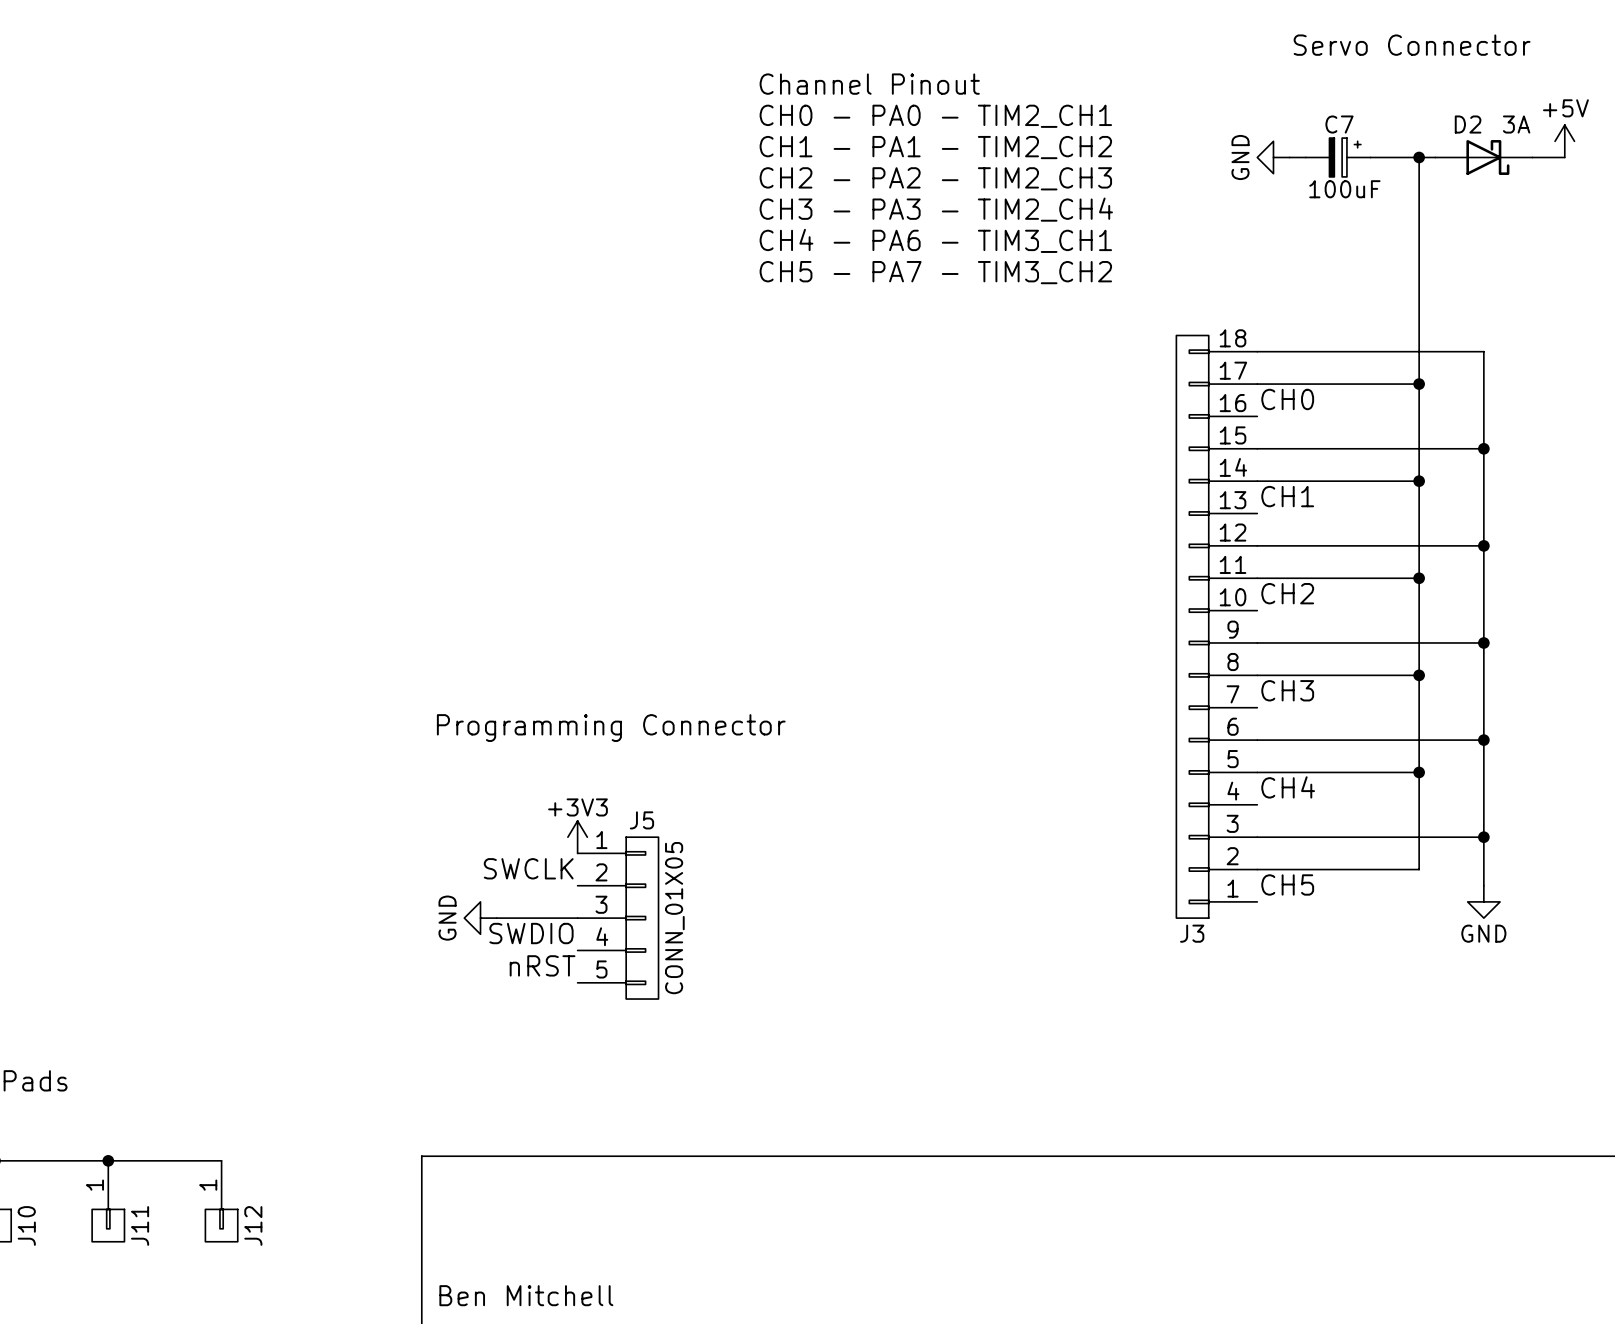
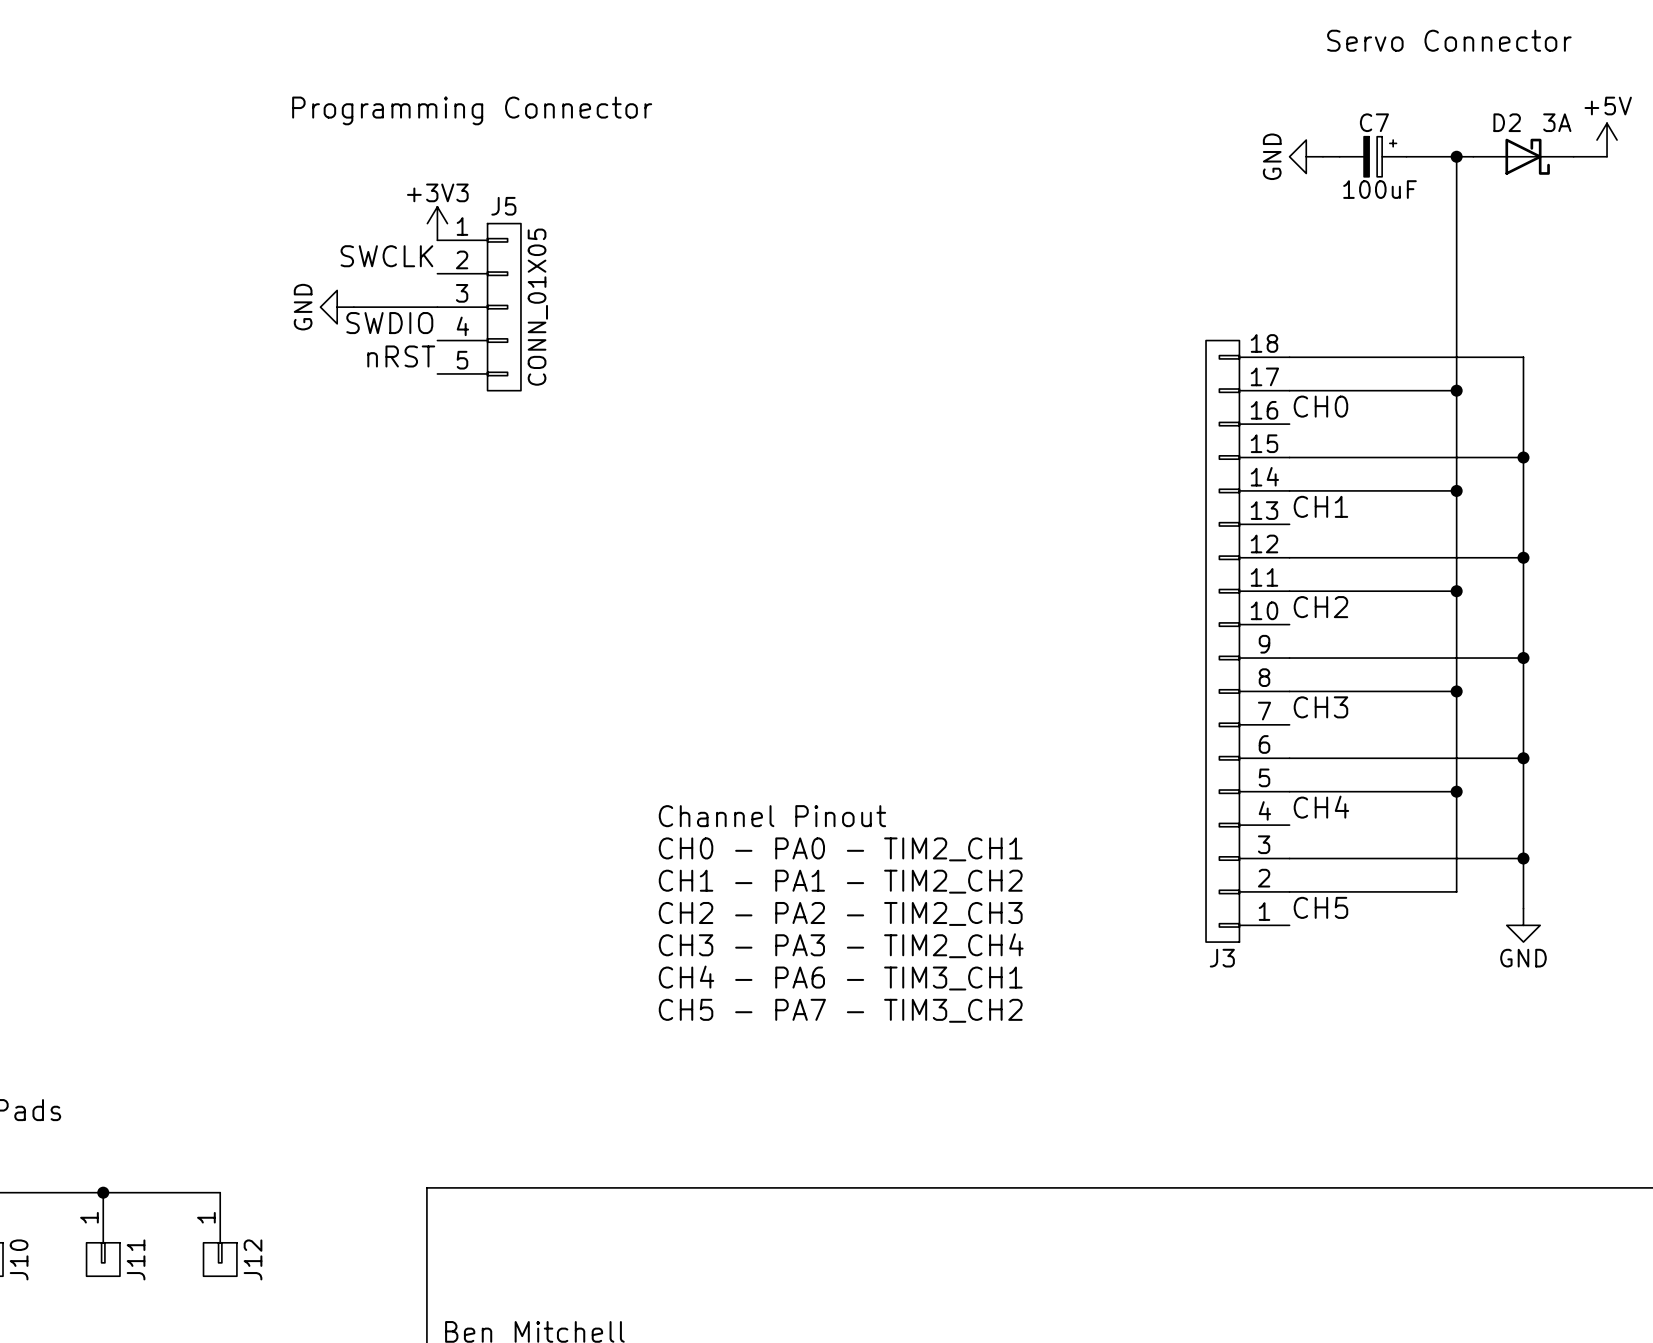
text: Channel Pinout (869, 84) -> none
text: none -> Programming Connector (472, 110)
text: CH0 - PA0 - TIM2_CH1 (935, 116) -> none
text: CH1 - PA1 - TIM2_CH2 (935, 147) -> none
text: CH2 - PA2 - TIM2_CH3 (935, 178) -> none
text: CH3 - PA3 - TIM2_CH4 (936, 209) -> none
power symbol: none -> +3V3 (437, 223)
text: CH4 - PA6 - TIM3_CH1 (935, 240) -> none
label: none -> SWCLK (386, 256)
text: CH5 - PA7 - TIM3_CH2 (935, 272) -> none
power symbol: none -> GND (337, 307)
wire: none -> (353, 307) (437, 307)
label: none -> SWDIO (389, 323)
label: none -> nRST (401, 356)
text: Programming Connector (611, 728) -> none
text: none -> Channel Pinout (772, 816)
text: none -> CH0 - PA0 - TIM2_CH1 (840, 849)
power symbol: +3V3 (577, 837) -> none
text: none -> CH1 - PA1 - TIM2_CH2 (840, 881)
label: SWCLK (528, 868) -> none
text: none -> CH2 - PA2 - TIM2_CH3 (840, 913)
power symbol: GND (480, 918) -> none
wire: (496, 918) (577, 918) -> none
J5 position: (618, 918) -> (479, 307)
text: none -> CH3 - PA3 - TIM2_CH4 (841, 945)
label: SWDIO (531, 933) -> none
text: none -> CH4 - PA6 - TIM3_CH1 (840, 978)
label: nRST (542, 965) -> none
text: none -> CH5 - PA7 - TIM3_CH2 (840, 1010)

